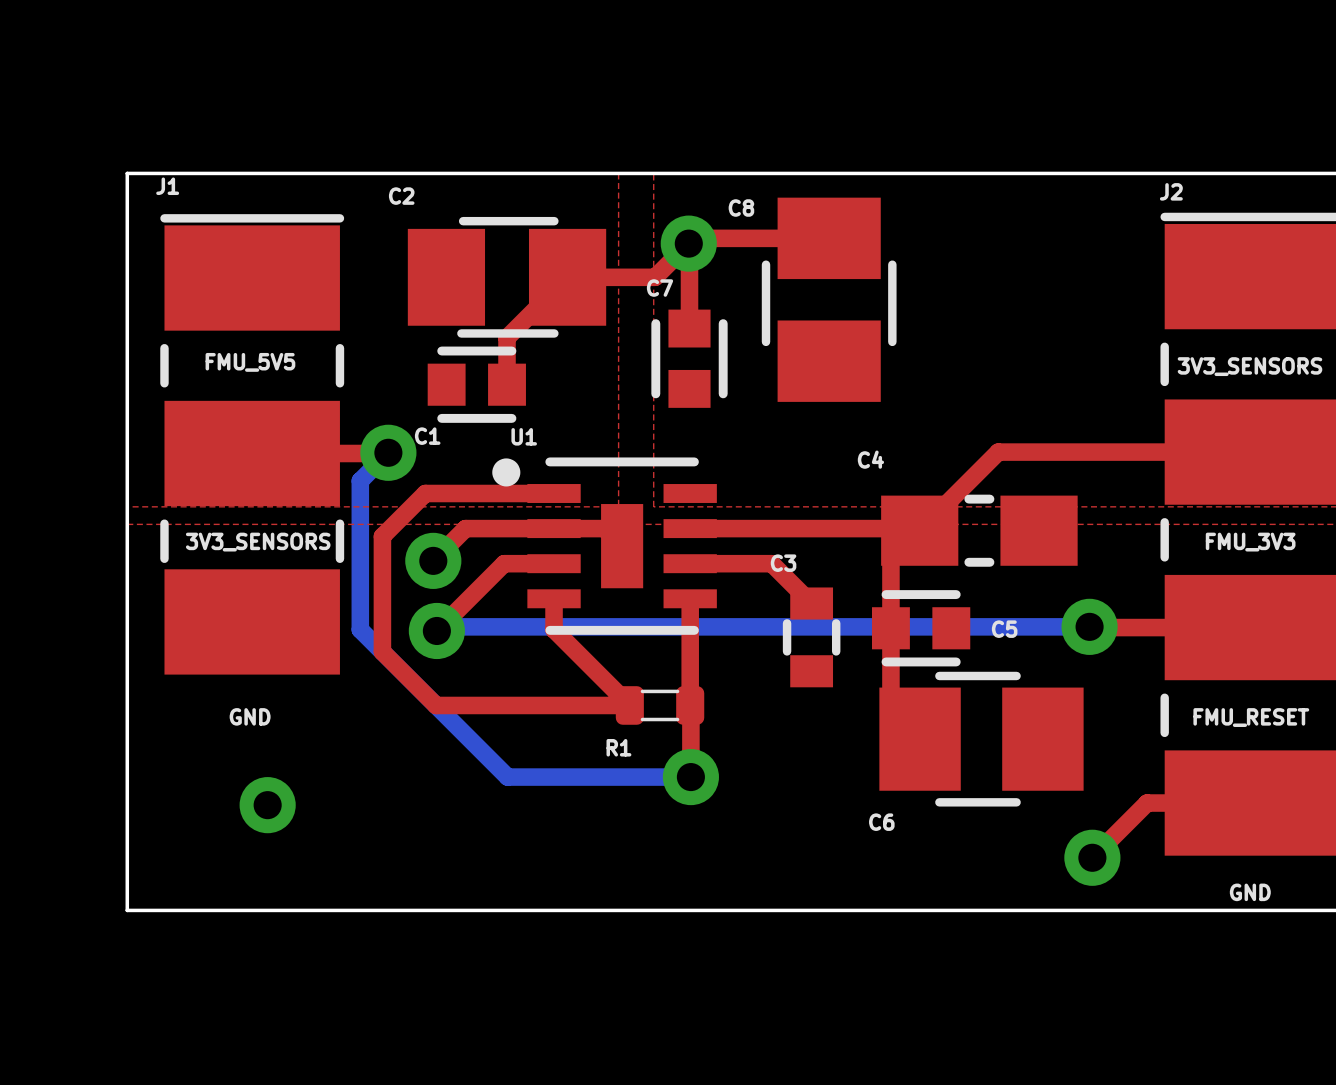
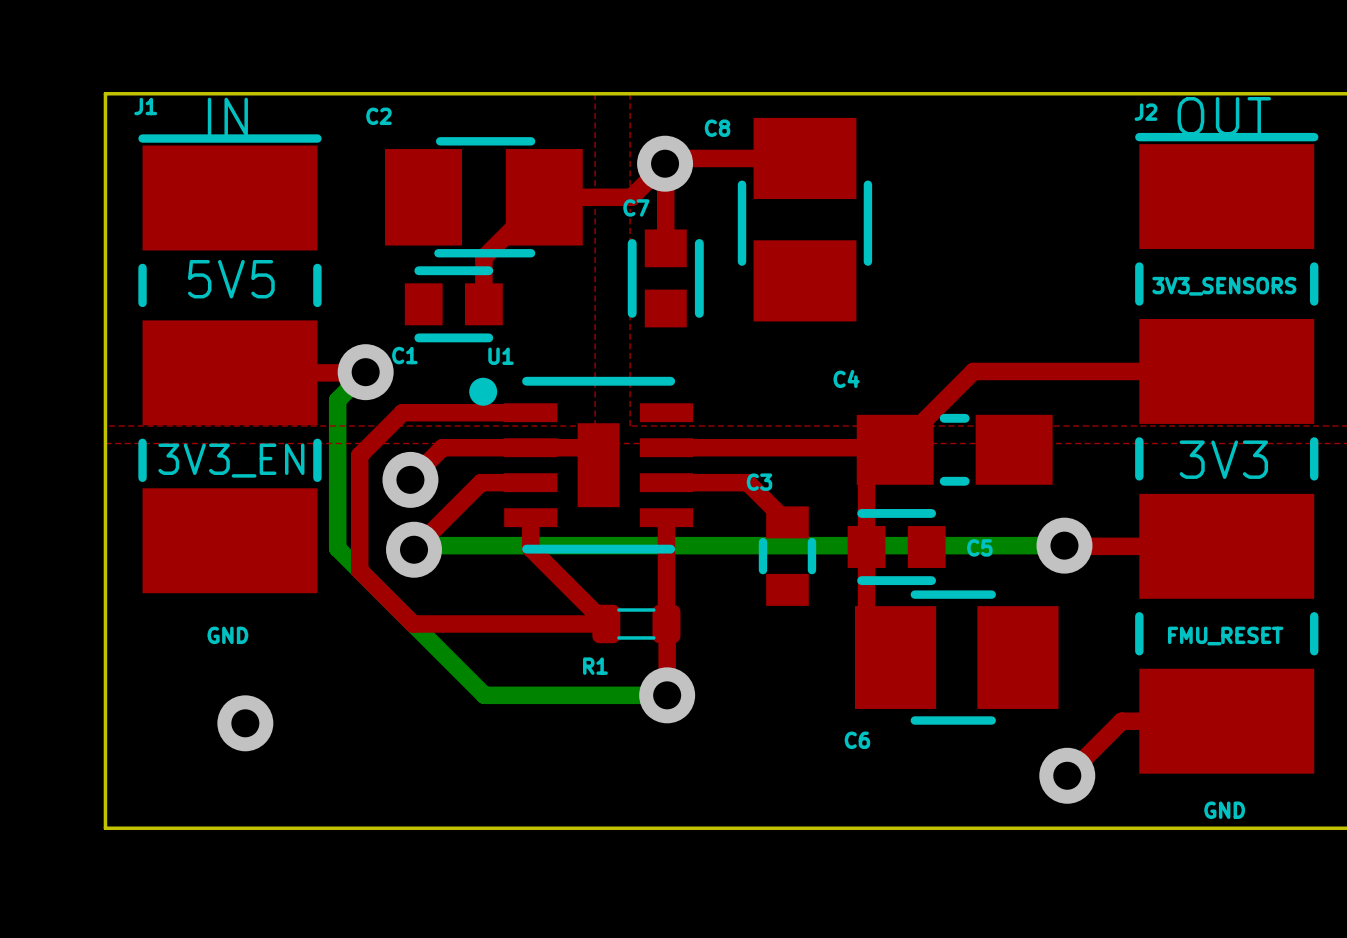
text: none -> OUT (1224, 116)
text: none -> IN (227, 116)
text: FMU_5V5 (250, 362) -> 5V5 (231, 279)
text: 3V3_SENSORS (258, 542) -> 3V3_EN (231, 460)
text: FMU_3V3 (1250, 542) -> 3V3 (1223, 459)

